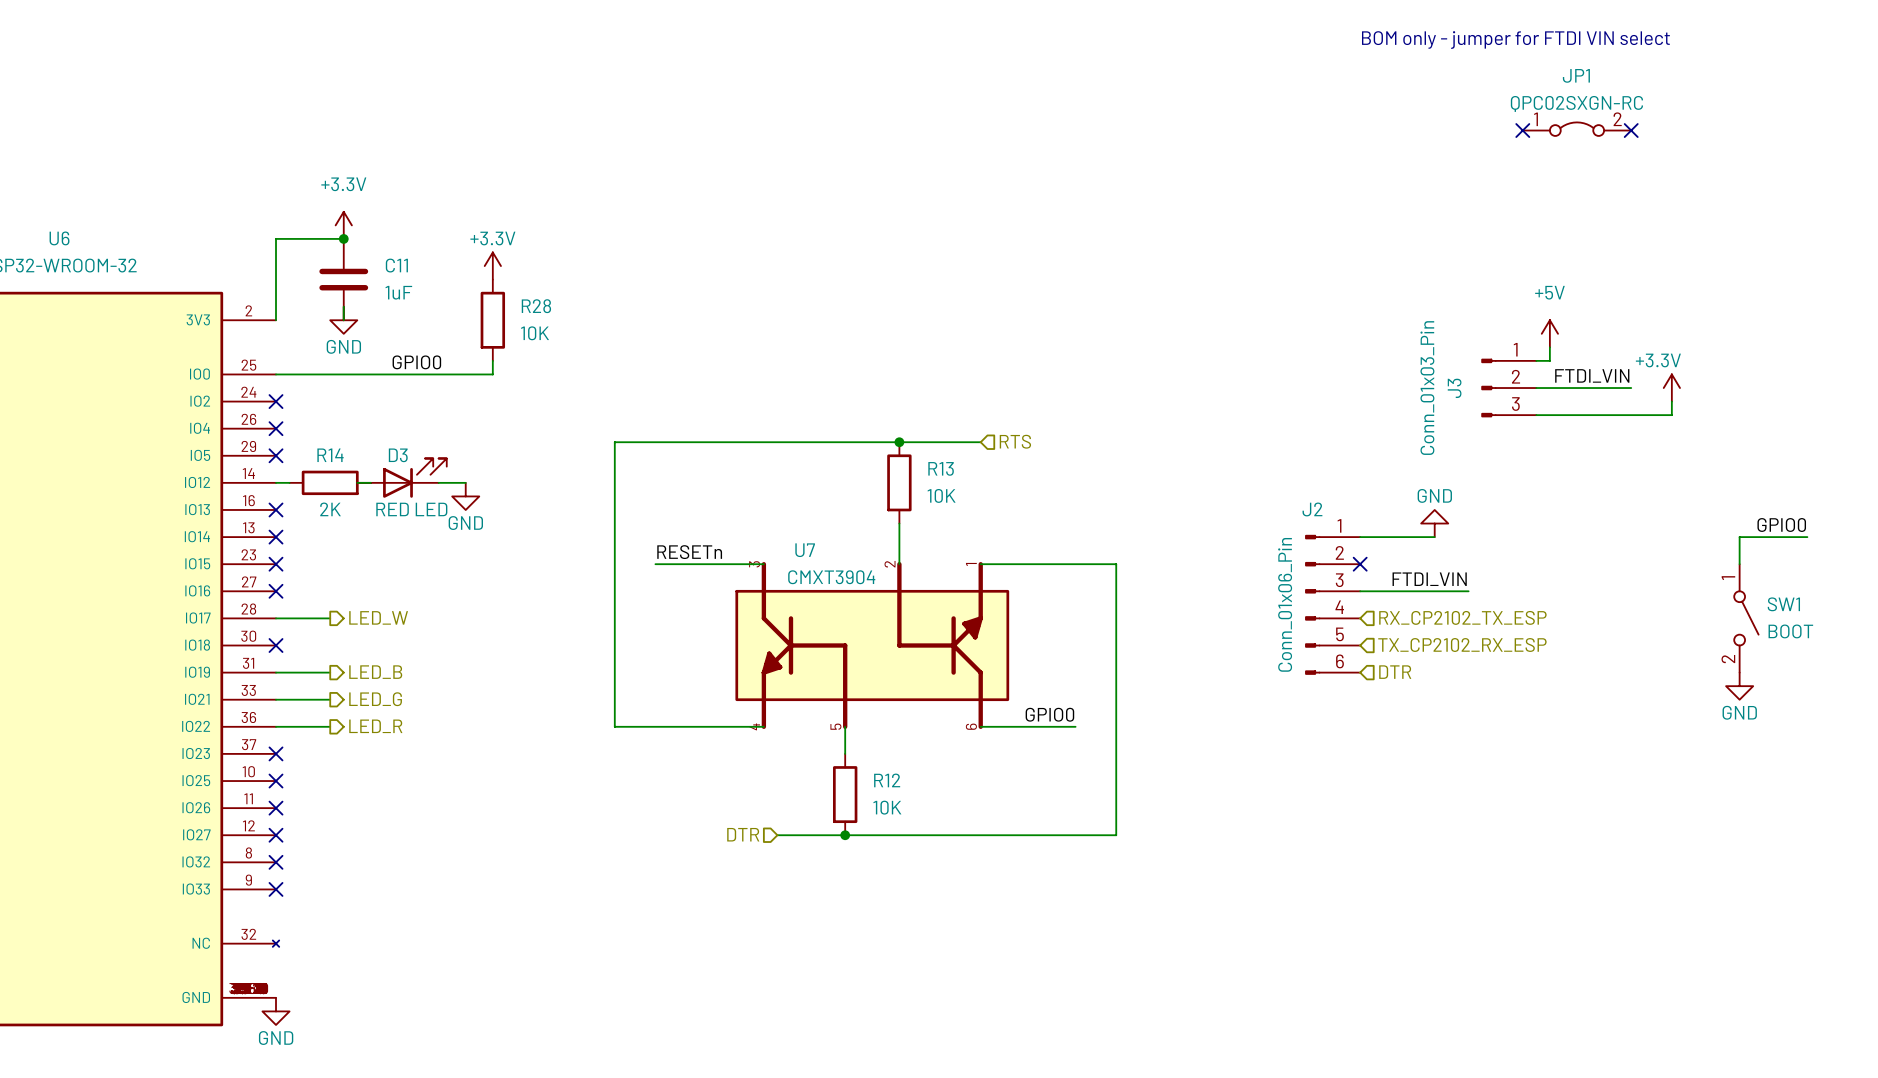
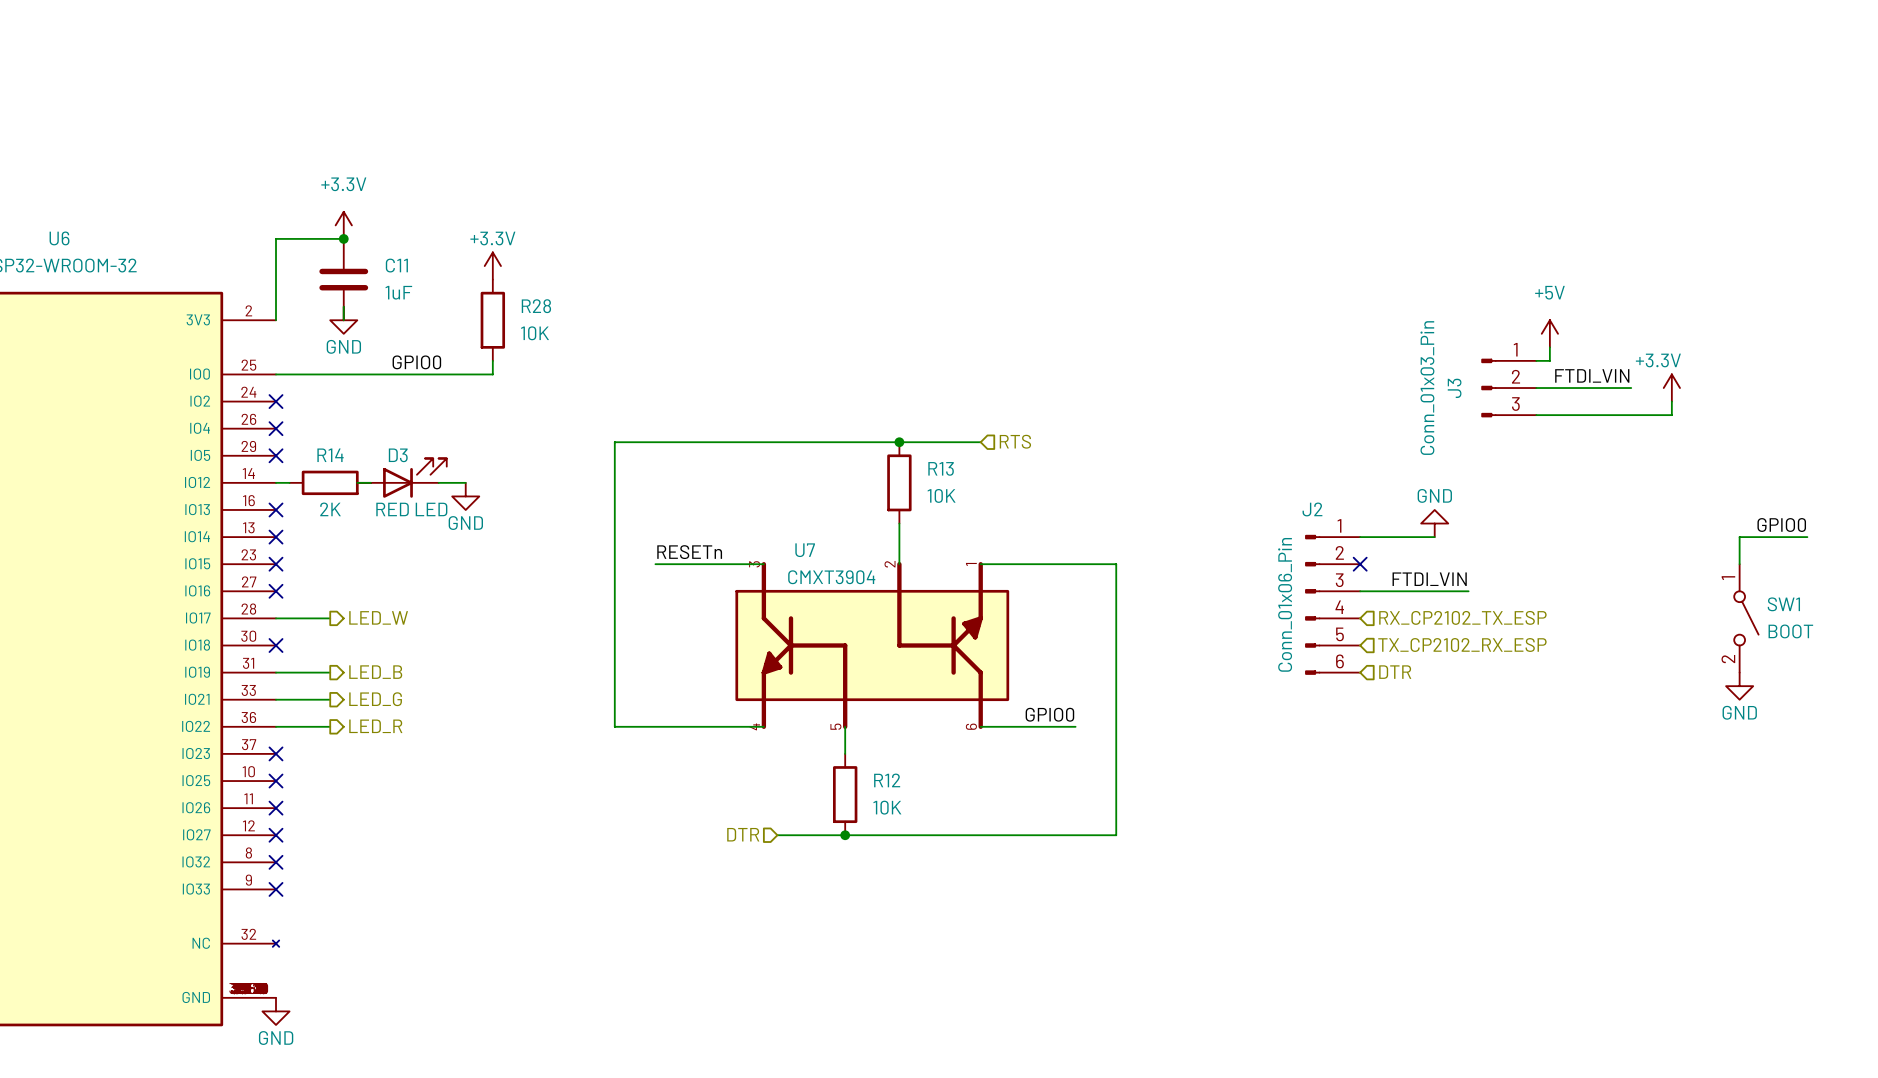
text: BOM only - jumper for FTDI VIN select (1515, 40) -> none
JP1: QPC02SXGN-RC (1577, 129) -> none
no-connect mark: (1522, 130) -> none
no-connect mark: (1631, 130) -> none

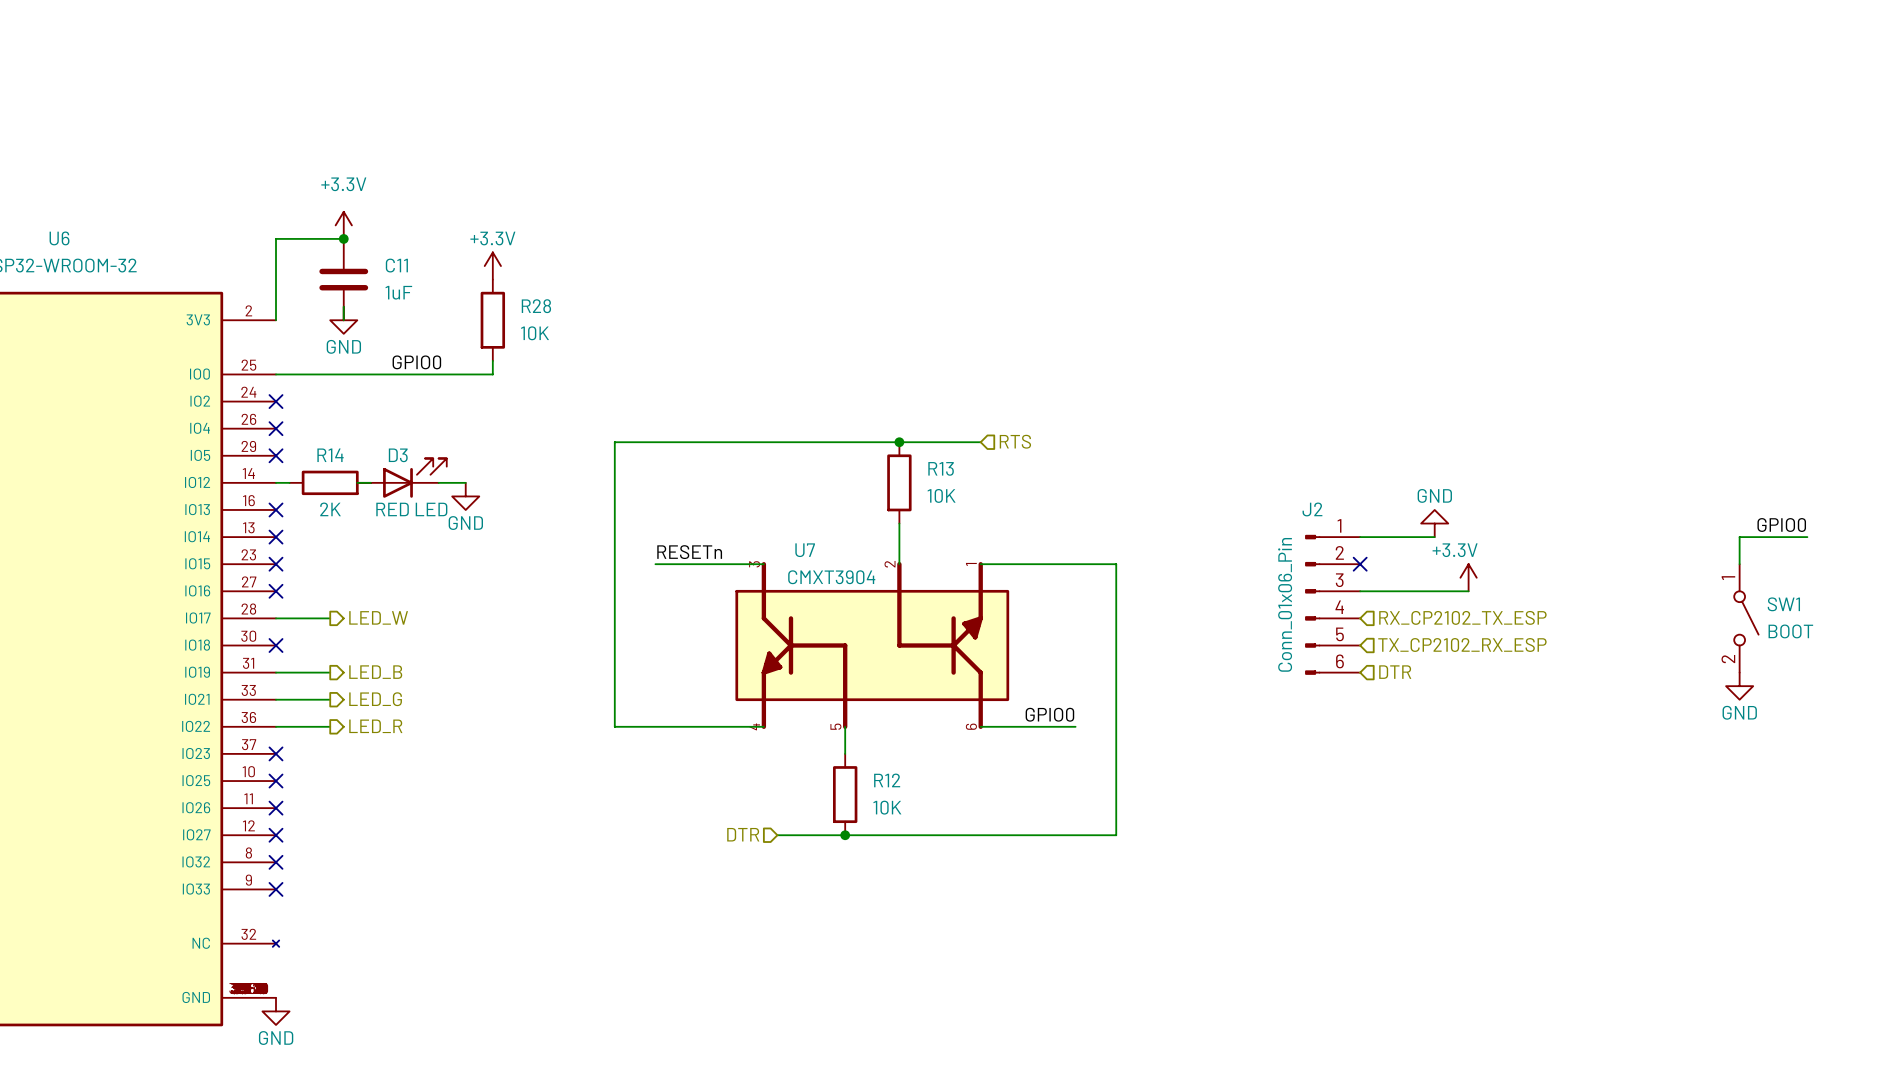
power symbol: +5V (1549, 333) -> none
wire: (1549, 347) (1549, 360) (1536, 360) -> none
label: FTDI_VIN (1592, 375) -> none
J3: Conn_01x03_Pin (1508, 388) -> none
wire: (1536, 388) (1631, 388) -> none
power symbol: +3.3V (1671, 388) -> none
wire: (1671, 401) (1671, 415) (1536, 415) -> none
power symbol: none -> +3.3V (1468, 577)
label: FTDI_VIN (1429, 579) -> none

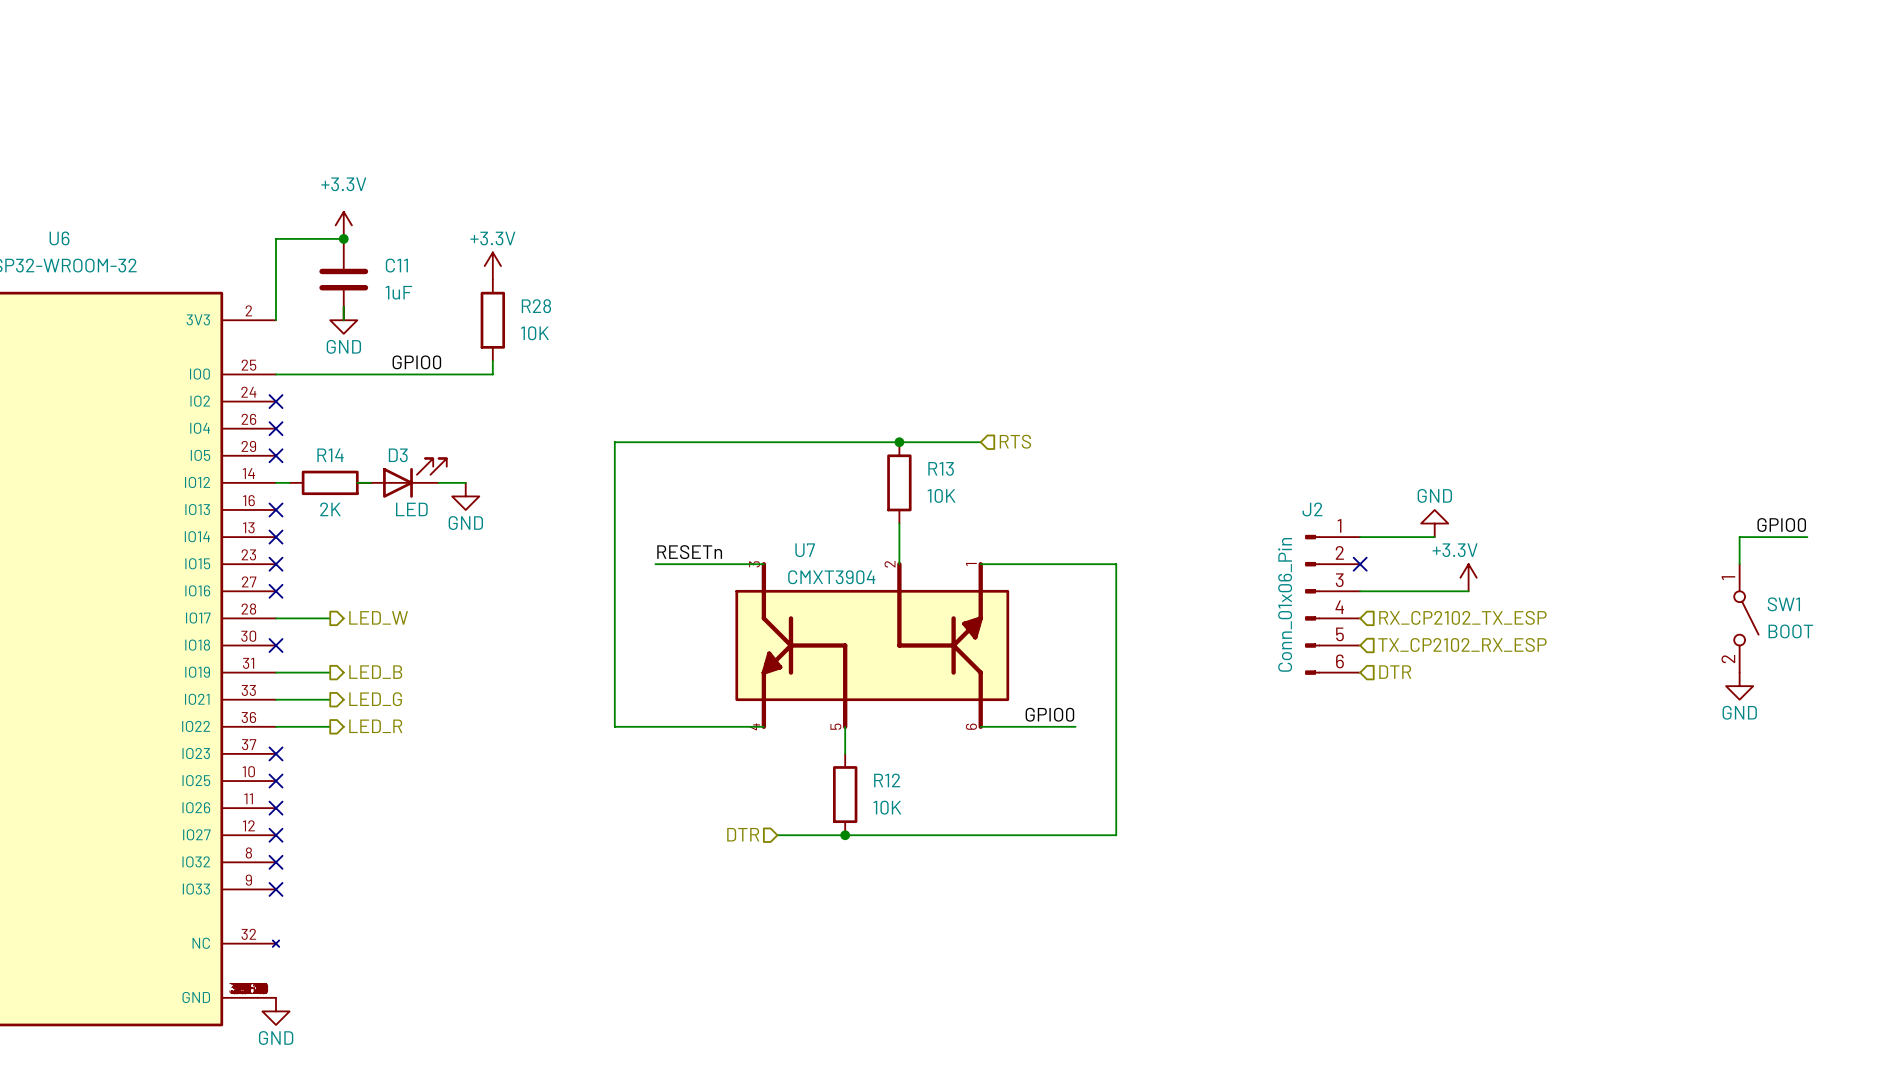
D3 value: RED LED (411, 509) -> LED (411, 509)

